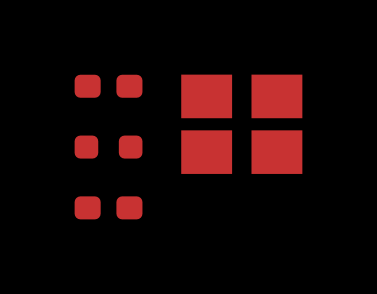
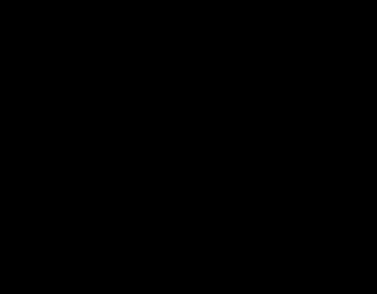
part: (108, 86) -> none
part: (241, 124) -> none
part: (108, 147) -> none
part: (108, 207) -> none

